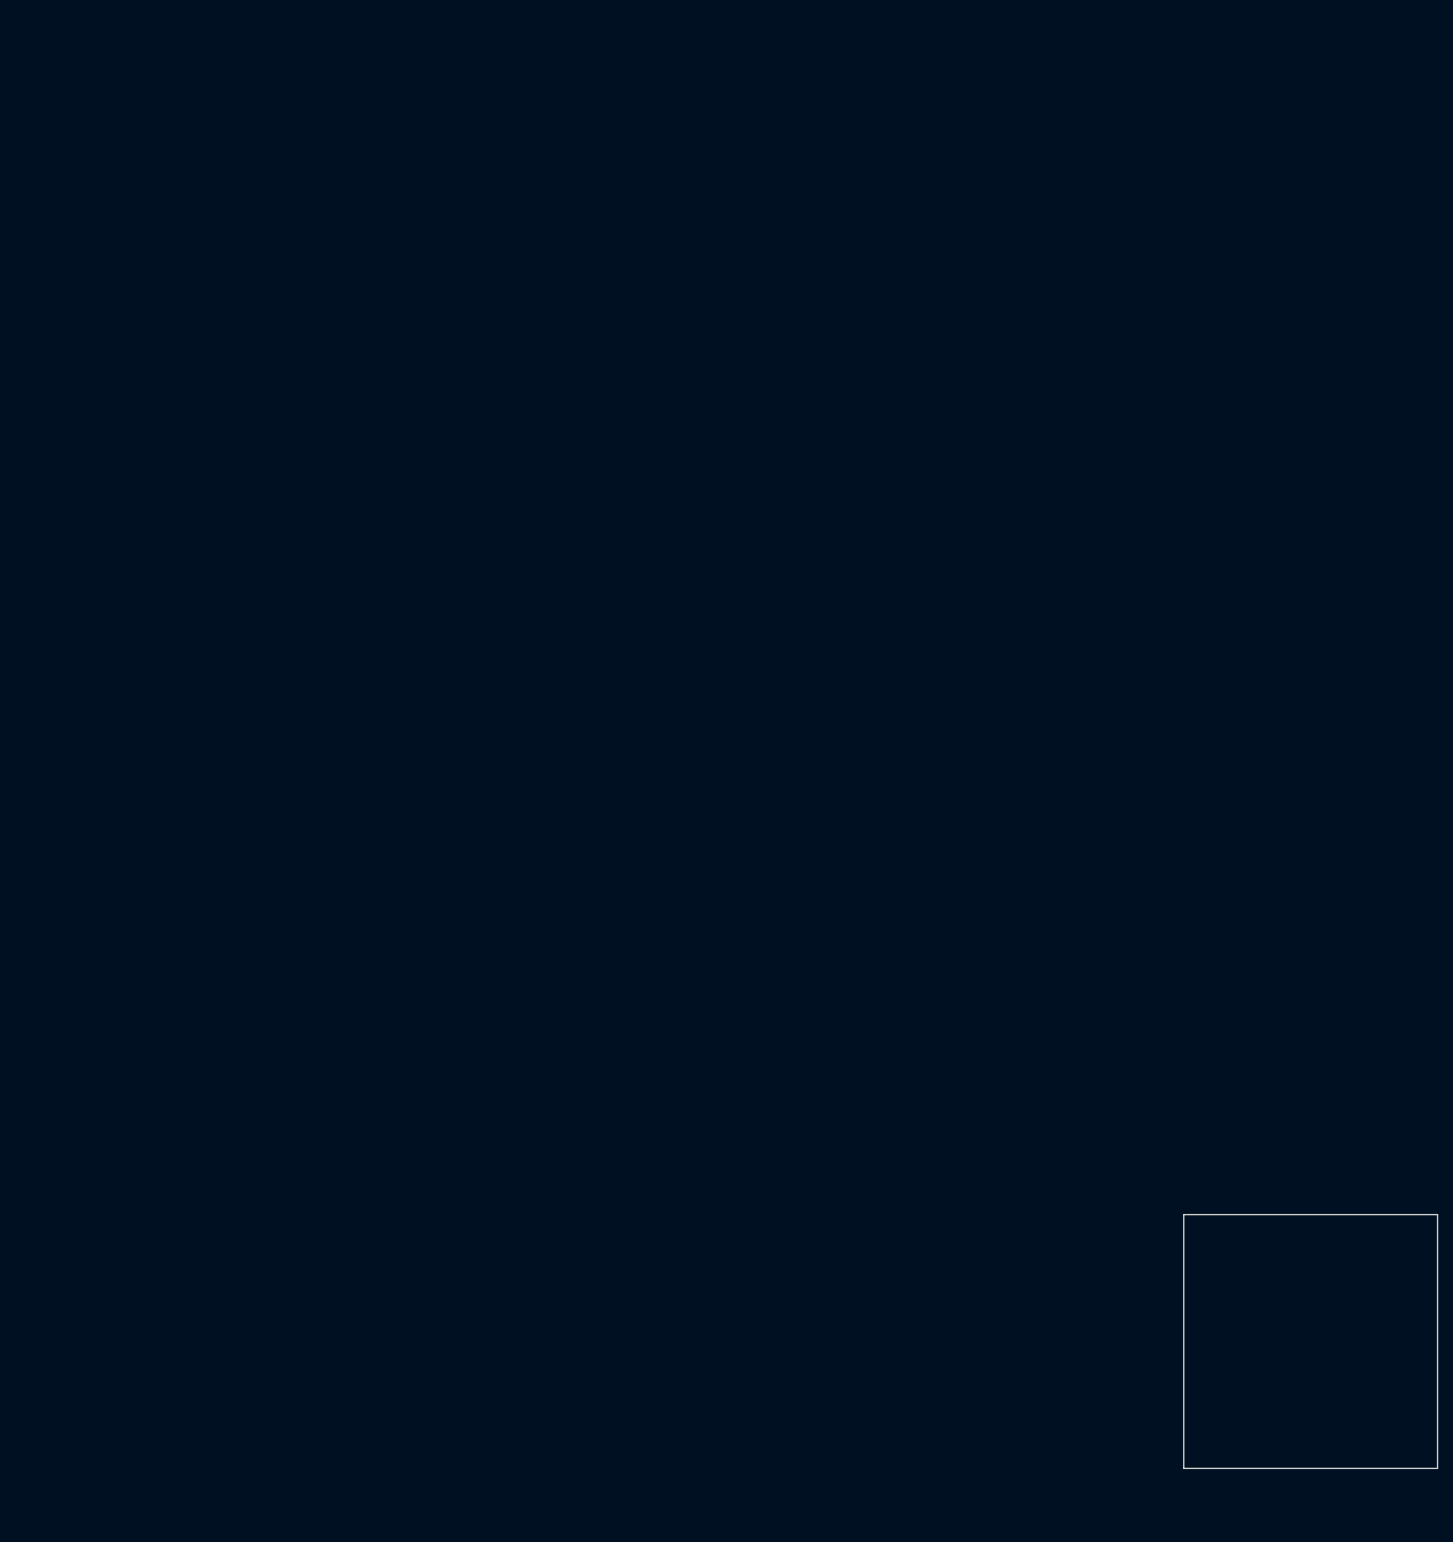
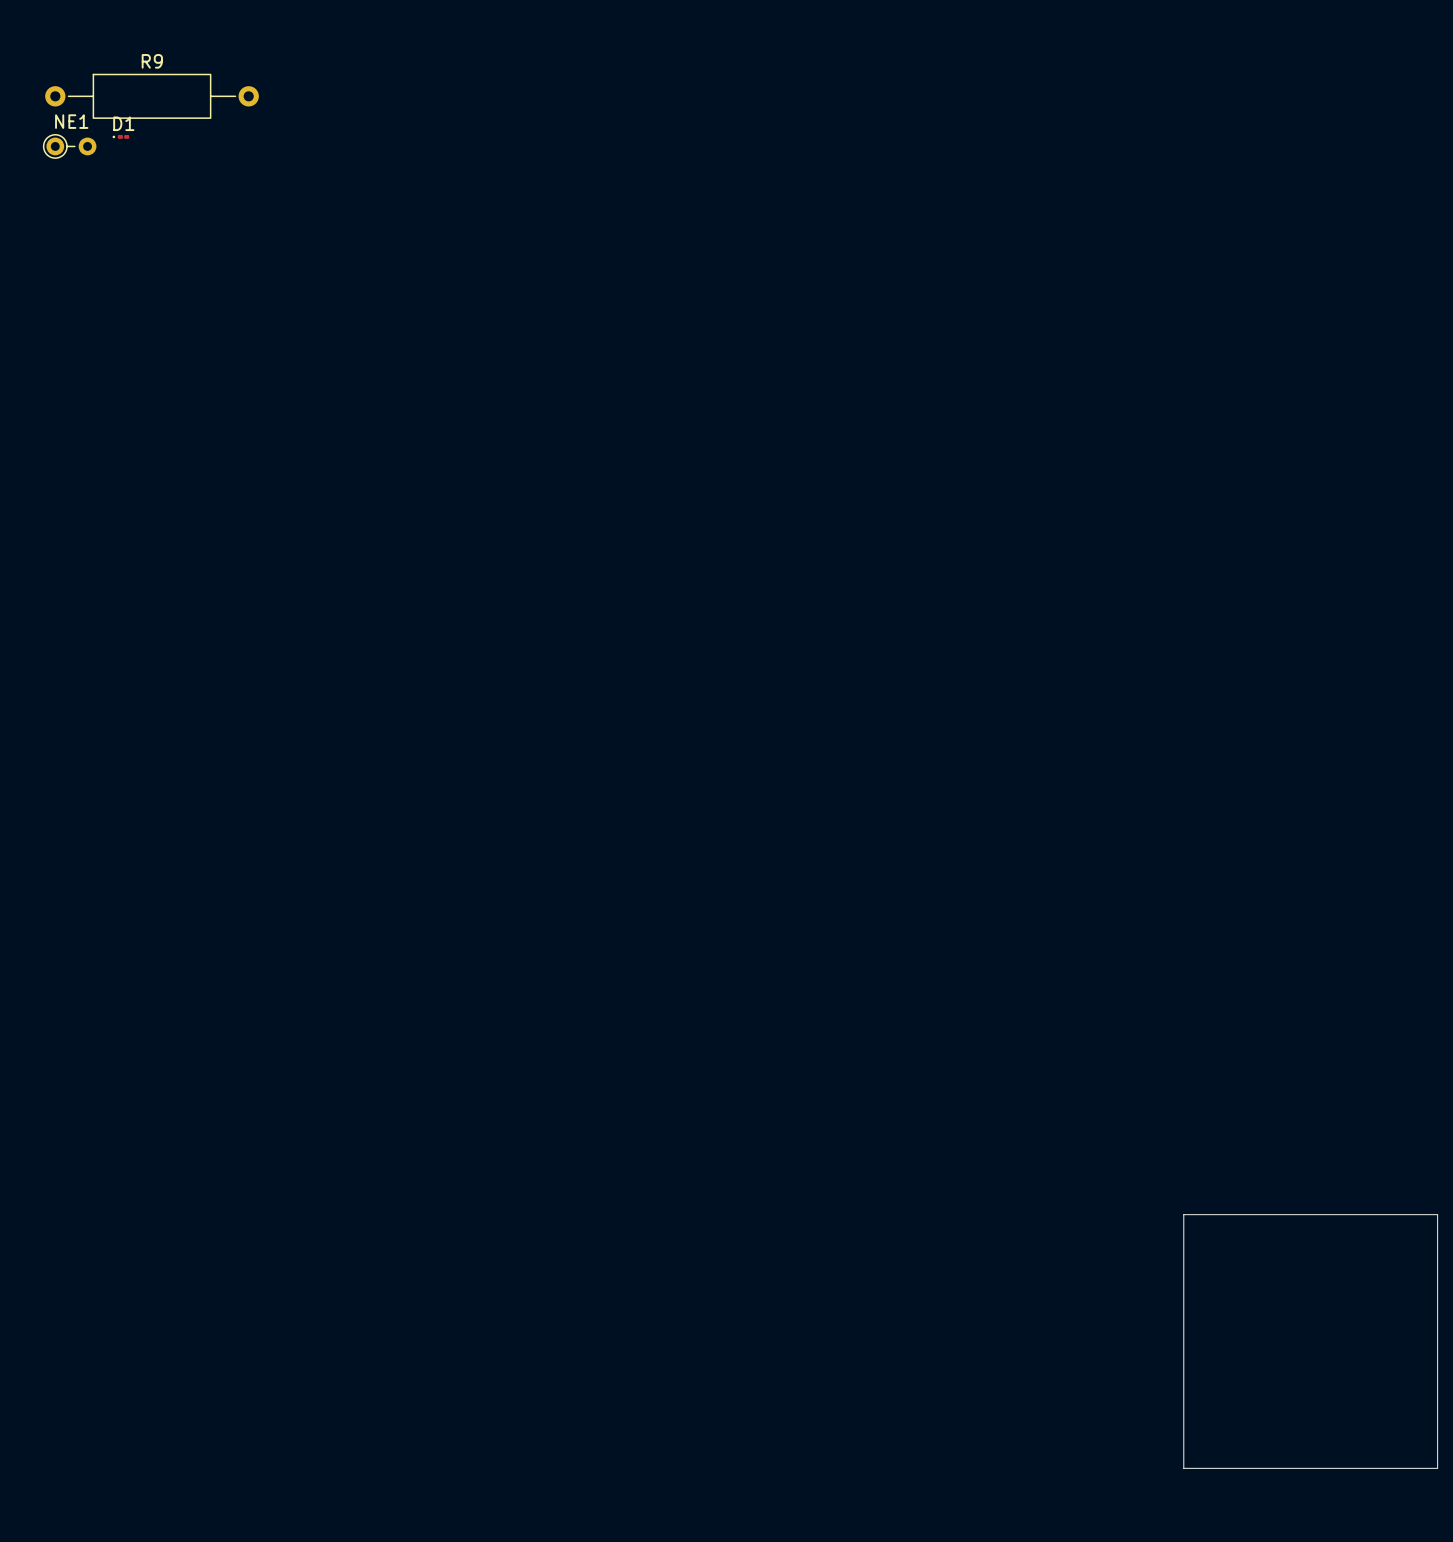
R9: none -> (152, 96)
D1: none -> (120, 136)
NE1: none -> (69, 146)

